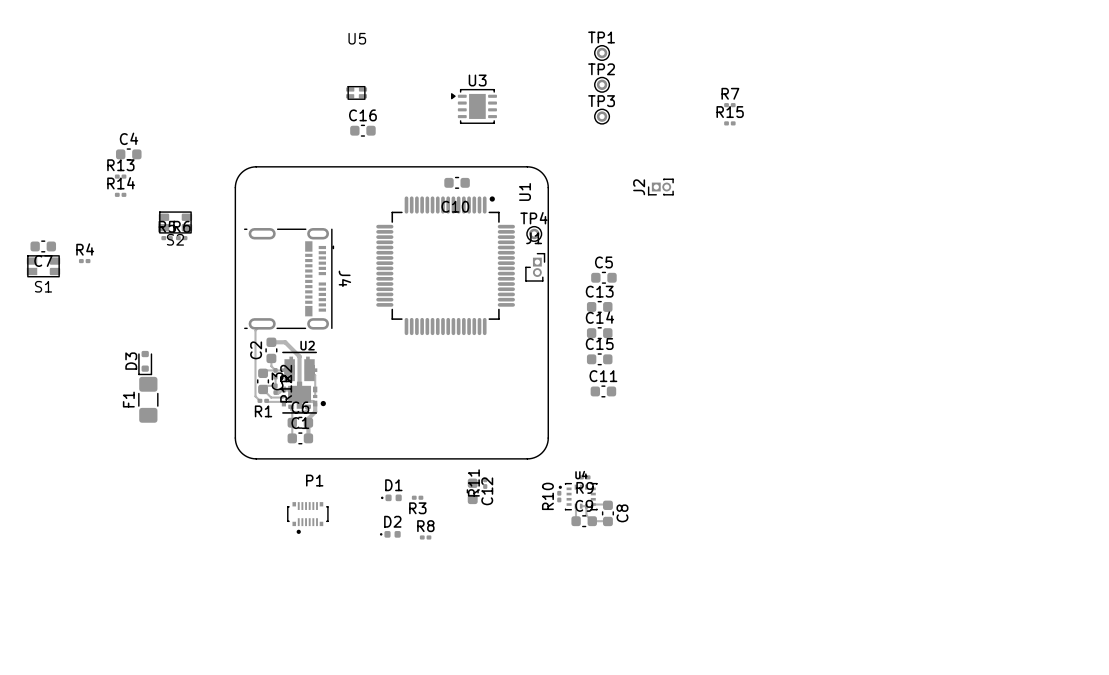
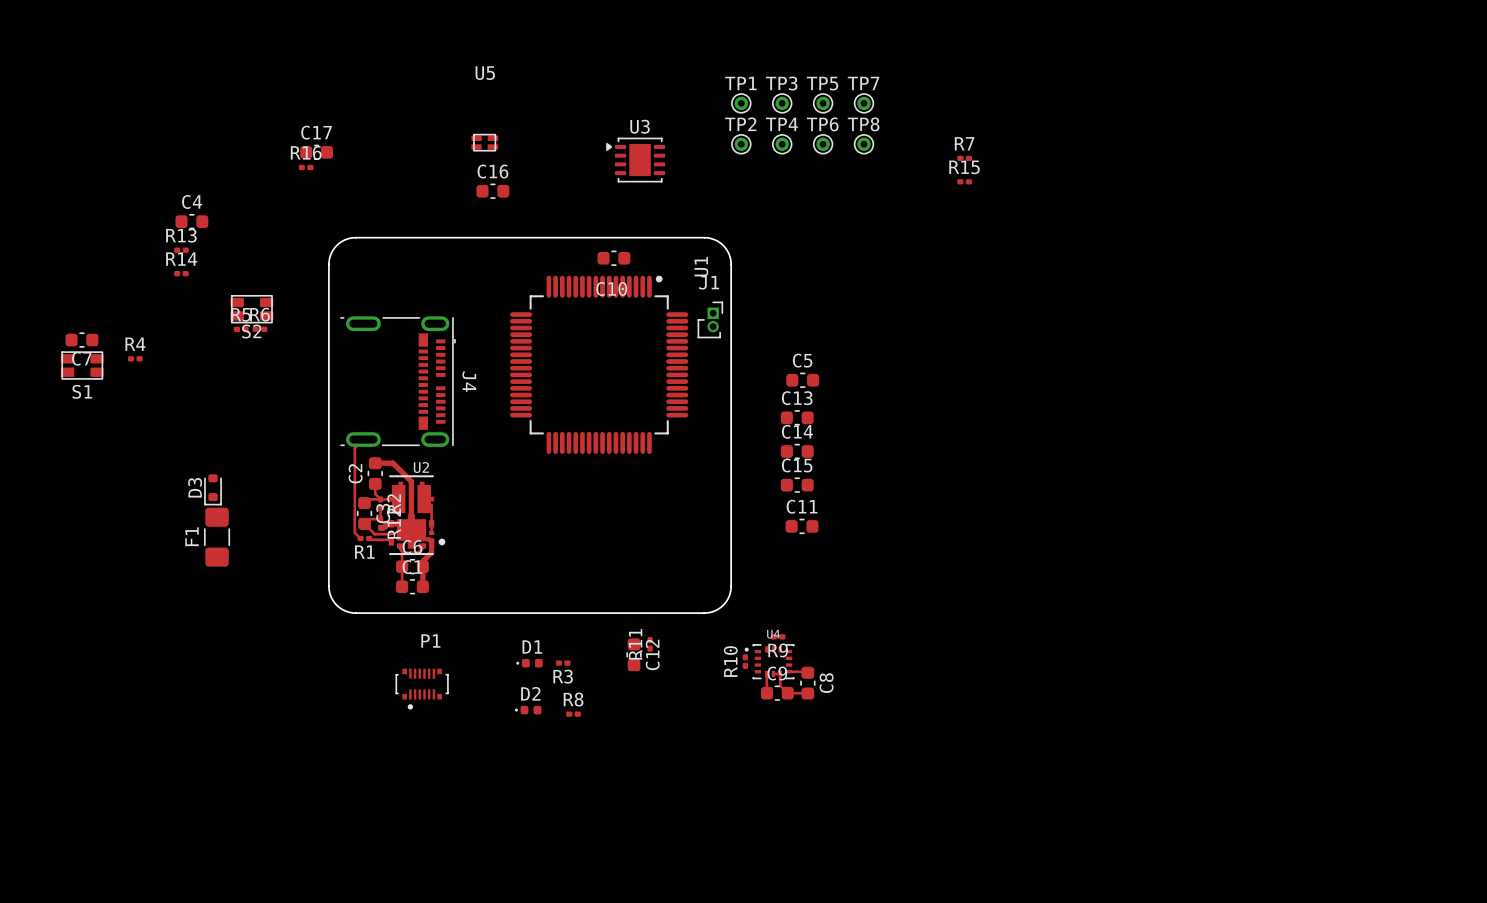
TP1 position: (602, 52) -> (741, 103)
TP5: none -> (823, 103)
TP7: none -> (863, 103)
TP2 position: (602, 84) -> (741, 144)
TP6: none -> (823, 144)
TP8: none -> (863, 144)
C17: none -> (316, 152)
R16: none -> (306, 167)
TP3 position: (602, 116) -> (782, 103)
J2: (660, 187) -> none
TP4 position: (534, 233) -> (782, 144)
J1 position: (535, 267) -> (710, 319)

